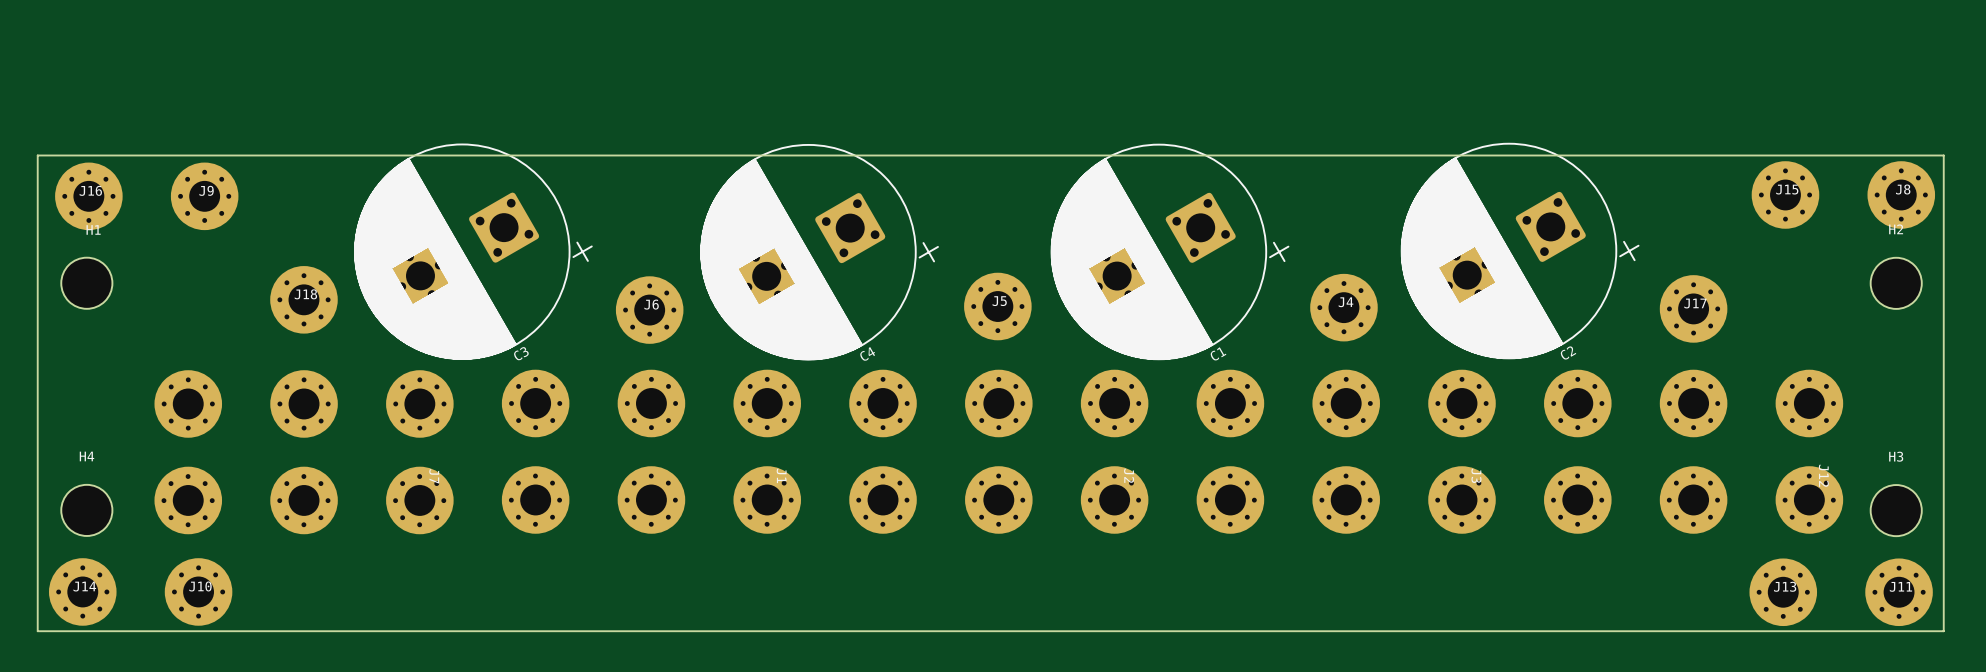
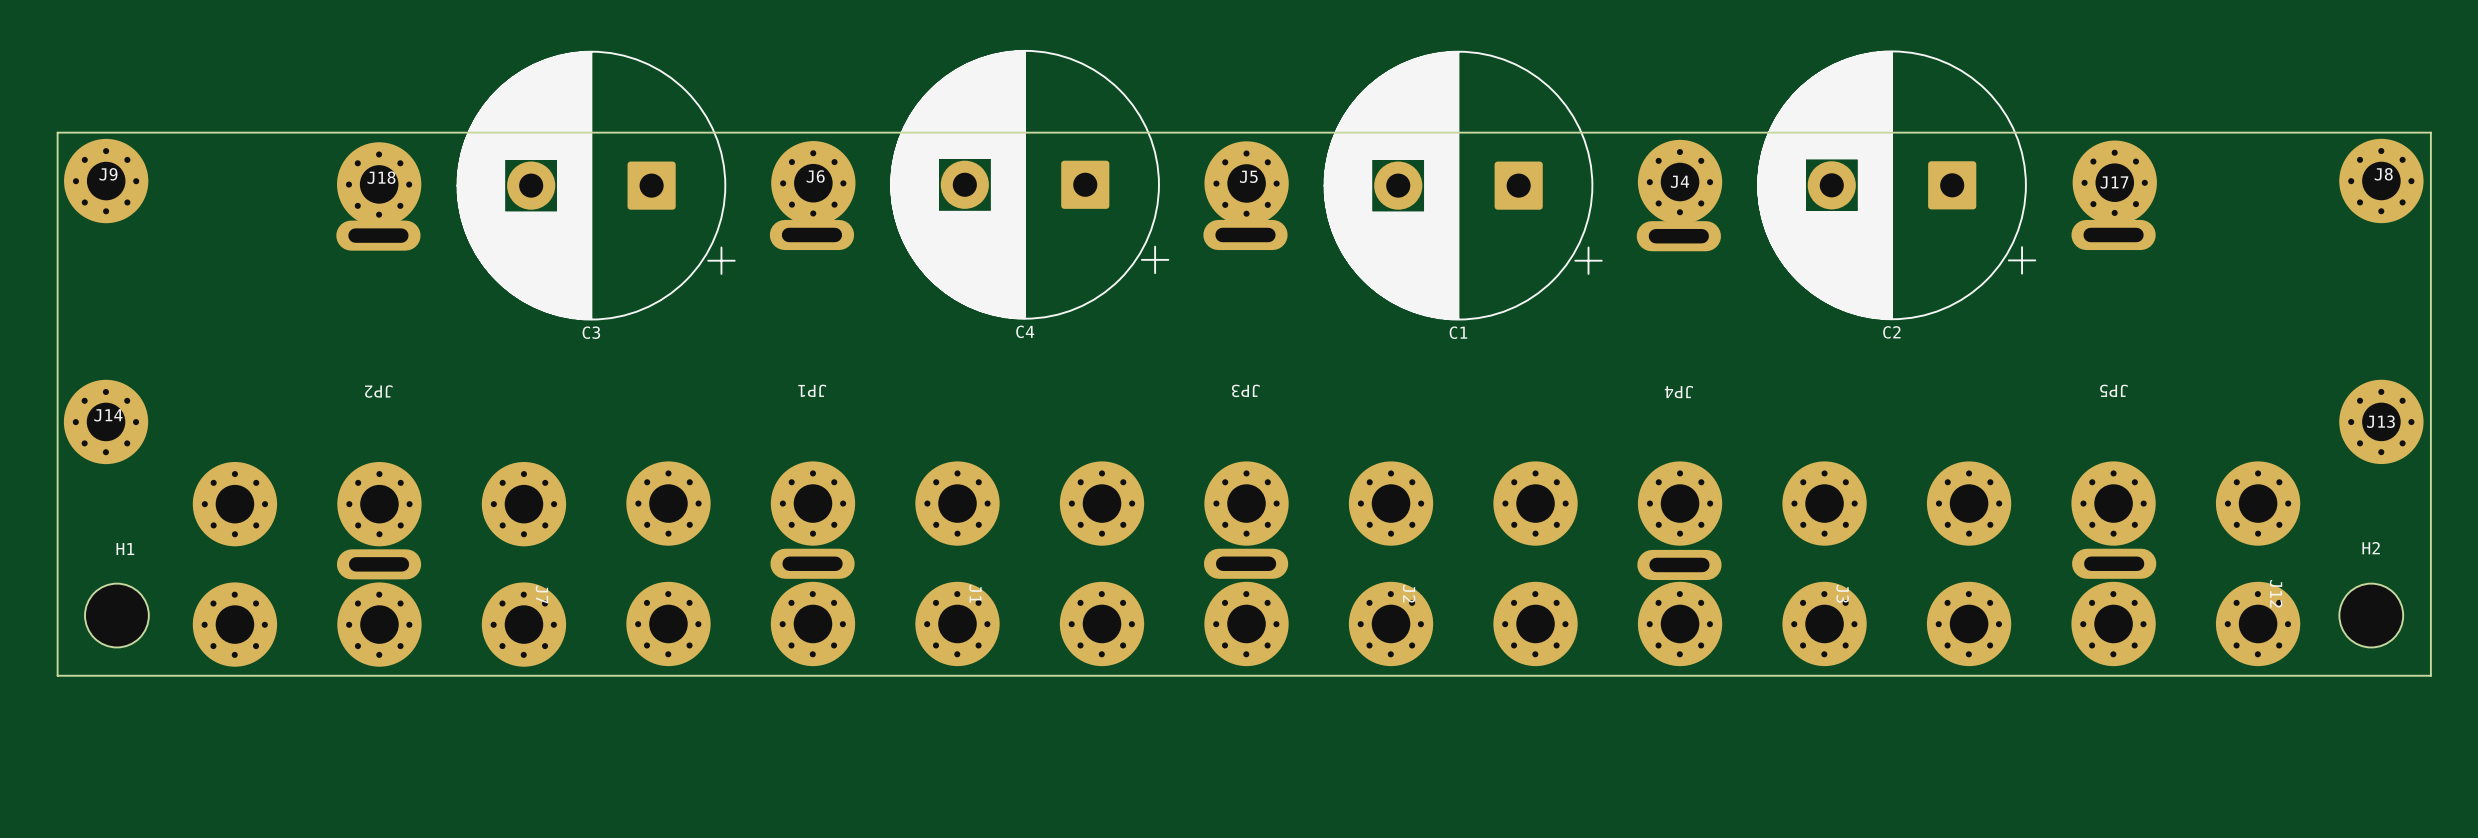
C3 footprint: [354, 143, 593, 360] -> [456, 50, 736, 321]
C2 footprint: [1401, 143, 1640, 359] -> [1757, 50, 2037, 320]
C4 footprint: [700, 144, 939, 361] -> [890, 50, 1170, 320]
C1 footprint: [1051, 144, 1290, 360] -> [1323, 50, 1603, 321]
board edge: (37, 155) (1943, 155) (1943, 631) (37, 631) (37, 155) -> (57, 132) (57, 675) (2430, 675) (2430, 132) (57, 132)
J15: (1785, 194) -> none
J8 position: (1901, 194) -> (2381, 180)
J16: (88, 196) -> none
J9 position: (204, 196) -> (106, 181)
H1 position: (86, 283) -> (116, 615)
H2 position: (1896, 283) -> (2371, 615)
J18 position: (303, 299) -> (379, 184)
J4 name position: J4 (1346, 302) -> J4 (1679, 181)
J17 name position: J17 (1695, 303) -> J17 (2114, 182)
J5 position: (997, 306) -> (1246, 183)
J4 position: (1343, 307) -> (1680, 182)
J17 position: (1693, 308) -> (2114, 182)
J6 position: (649, 310) -> (813, 183)
JP2: none -> (378, 399)
JP1: none -> (812, 399)
JP3: none -> (1245, 399)
JP4: none -> (1679, 400)
JP5: none -> (2113, 399)
C3 name position: C3 (521, 353) -> C3 (591, 332)
C2 name position: C2 (1568, 353) -> C2 (1891, 332)
C4 name position: C4 (867, 354) -> C4 (1025, 331)
C1 name position: C1 (1218, 354) -> C1 (1458, 332)
H4: (86, 510) -> none
H3: (1896, 510) -> none
J13 name position: J13 (1785, 586) -> J13 (2380, 421)
J14 position: (82, 591) -> (106, 421)
J10: (198, 591) -> none
J13 position: (1783, 592) -> (2381, 421)
J11: (1899, 592) -> none

